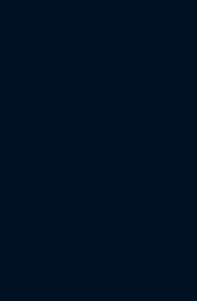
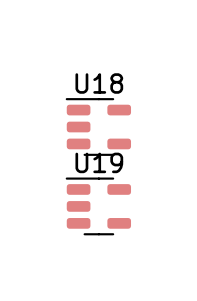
U18: none -> (98, 127)
U19: none -> (98, 206)

